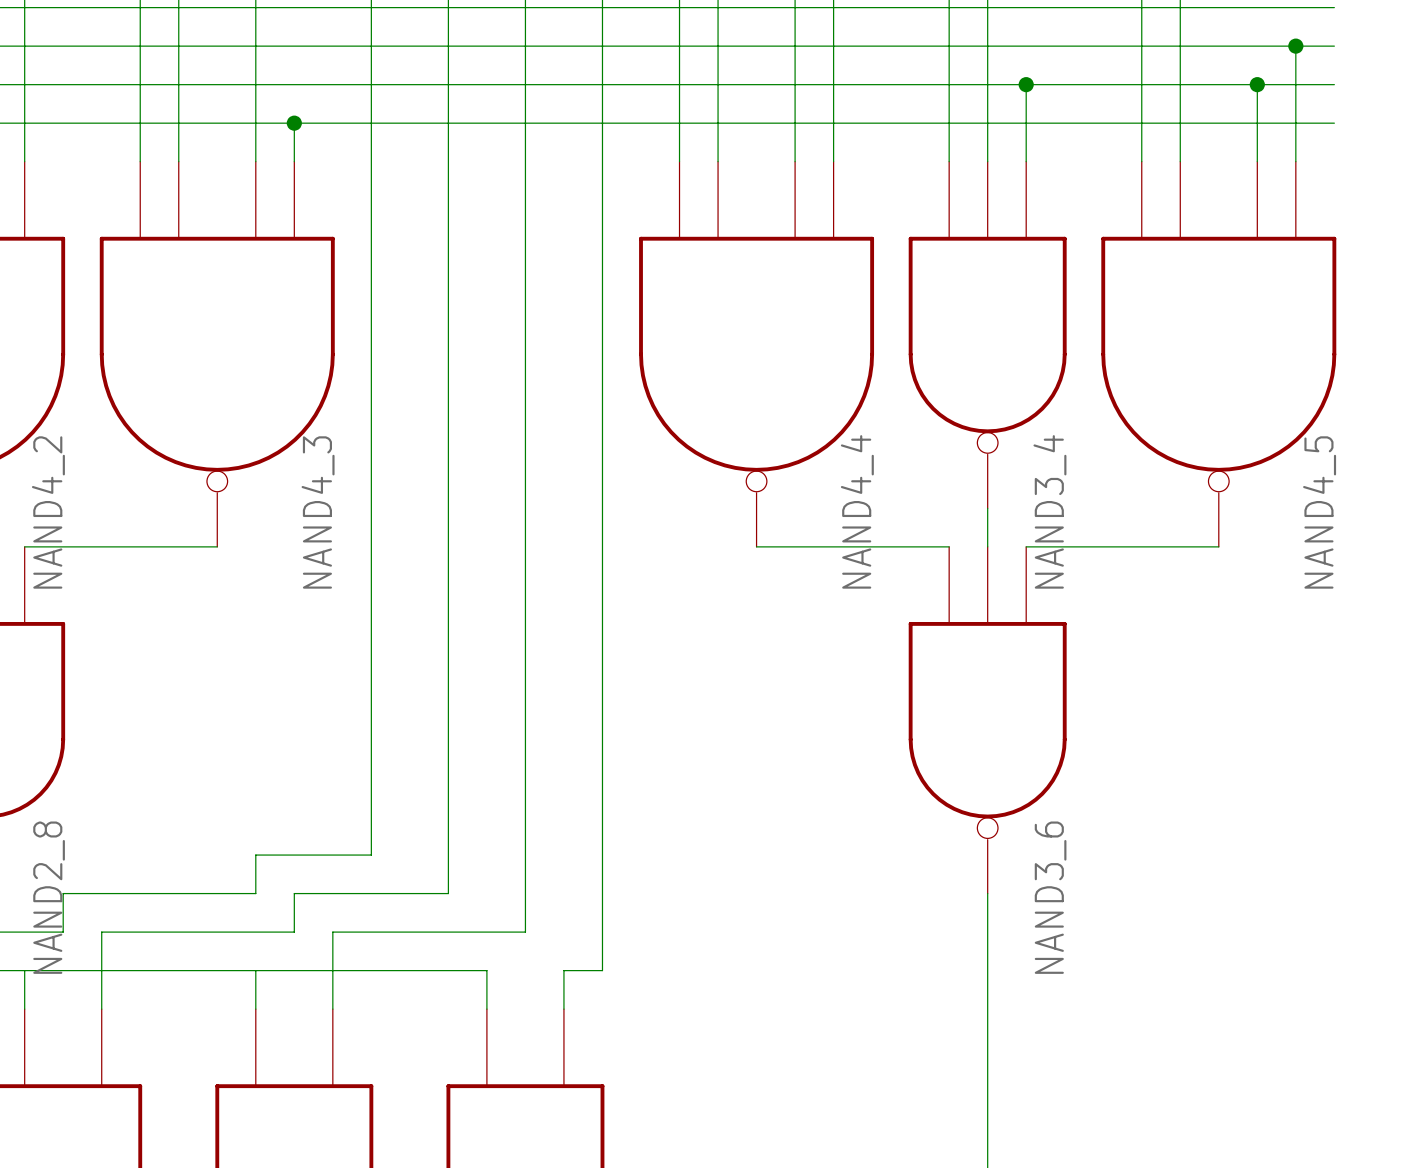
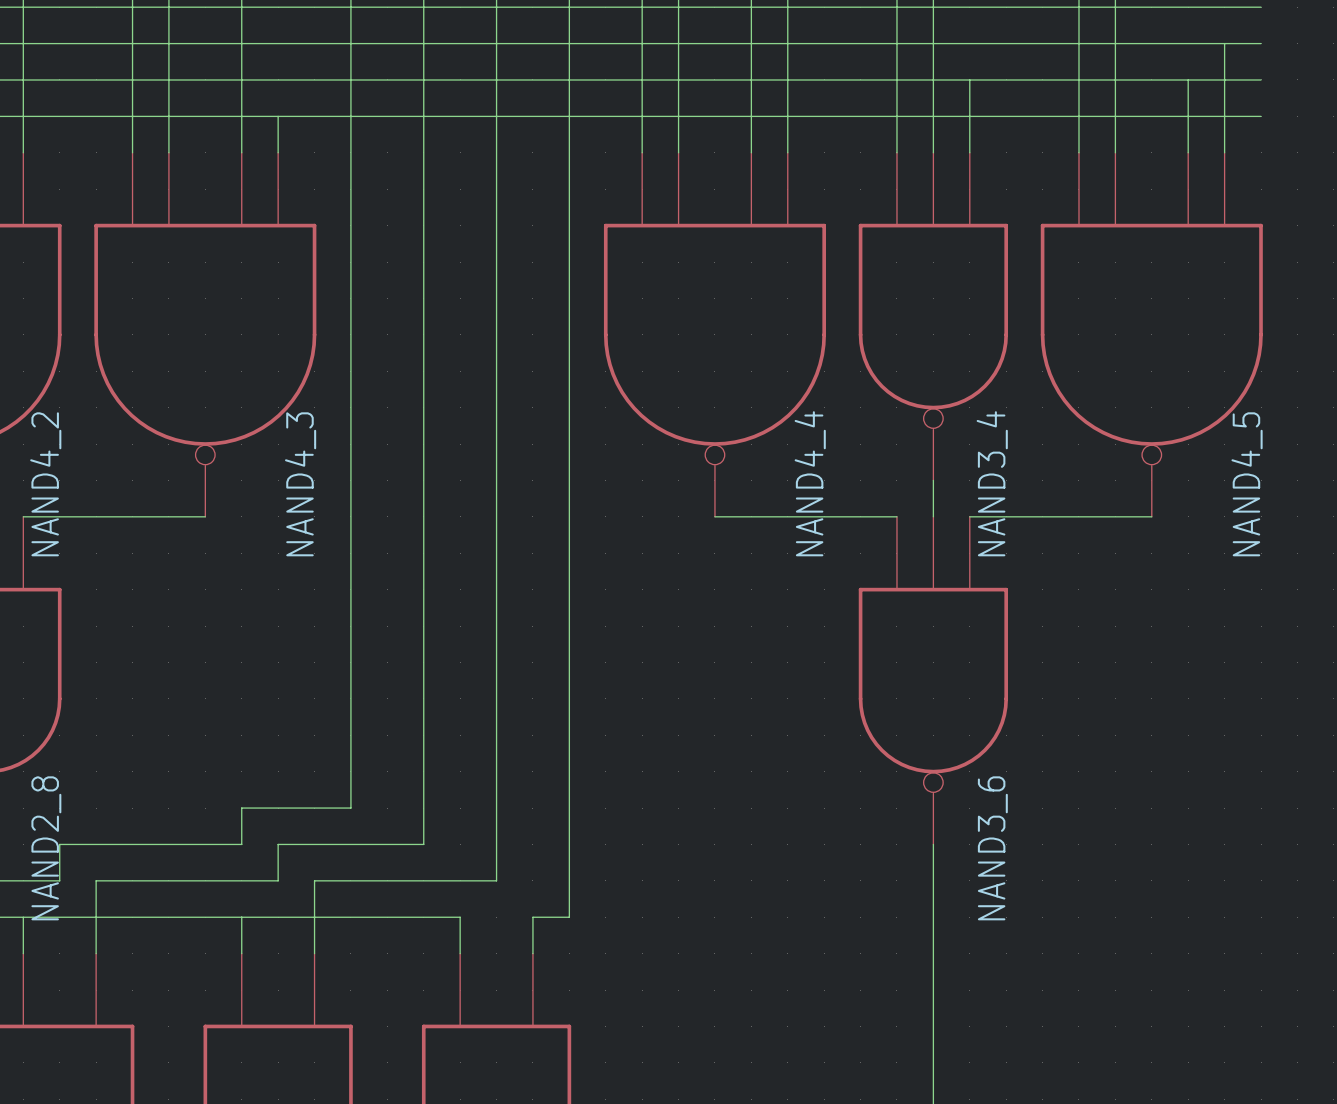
junction: (1295, 46) -> none
junction: (1026, 84) -> none
junction: (1257, 84) -> none
junction: (294, 123) -> none

